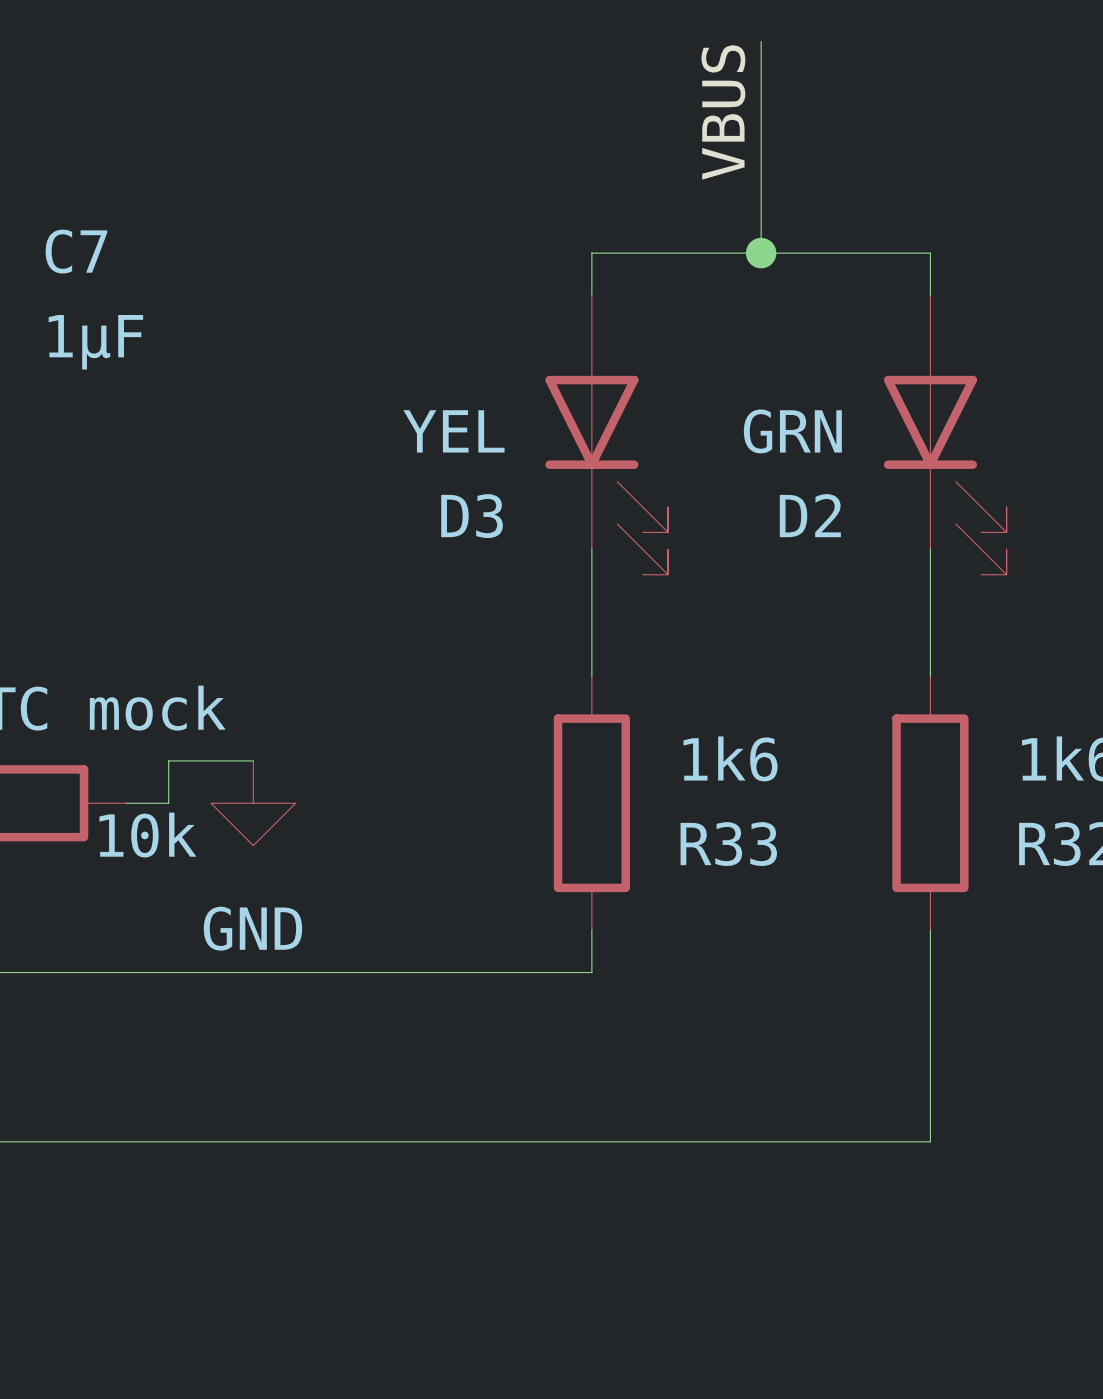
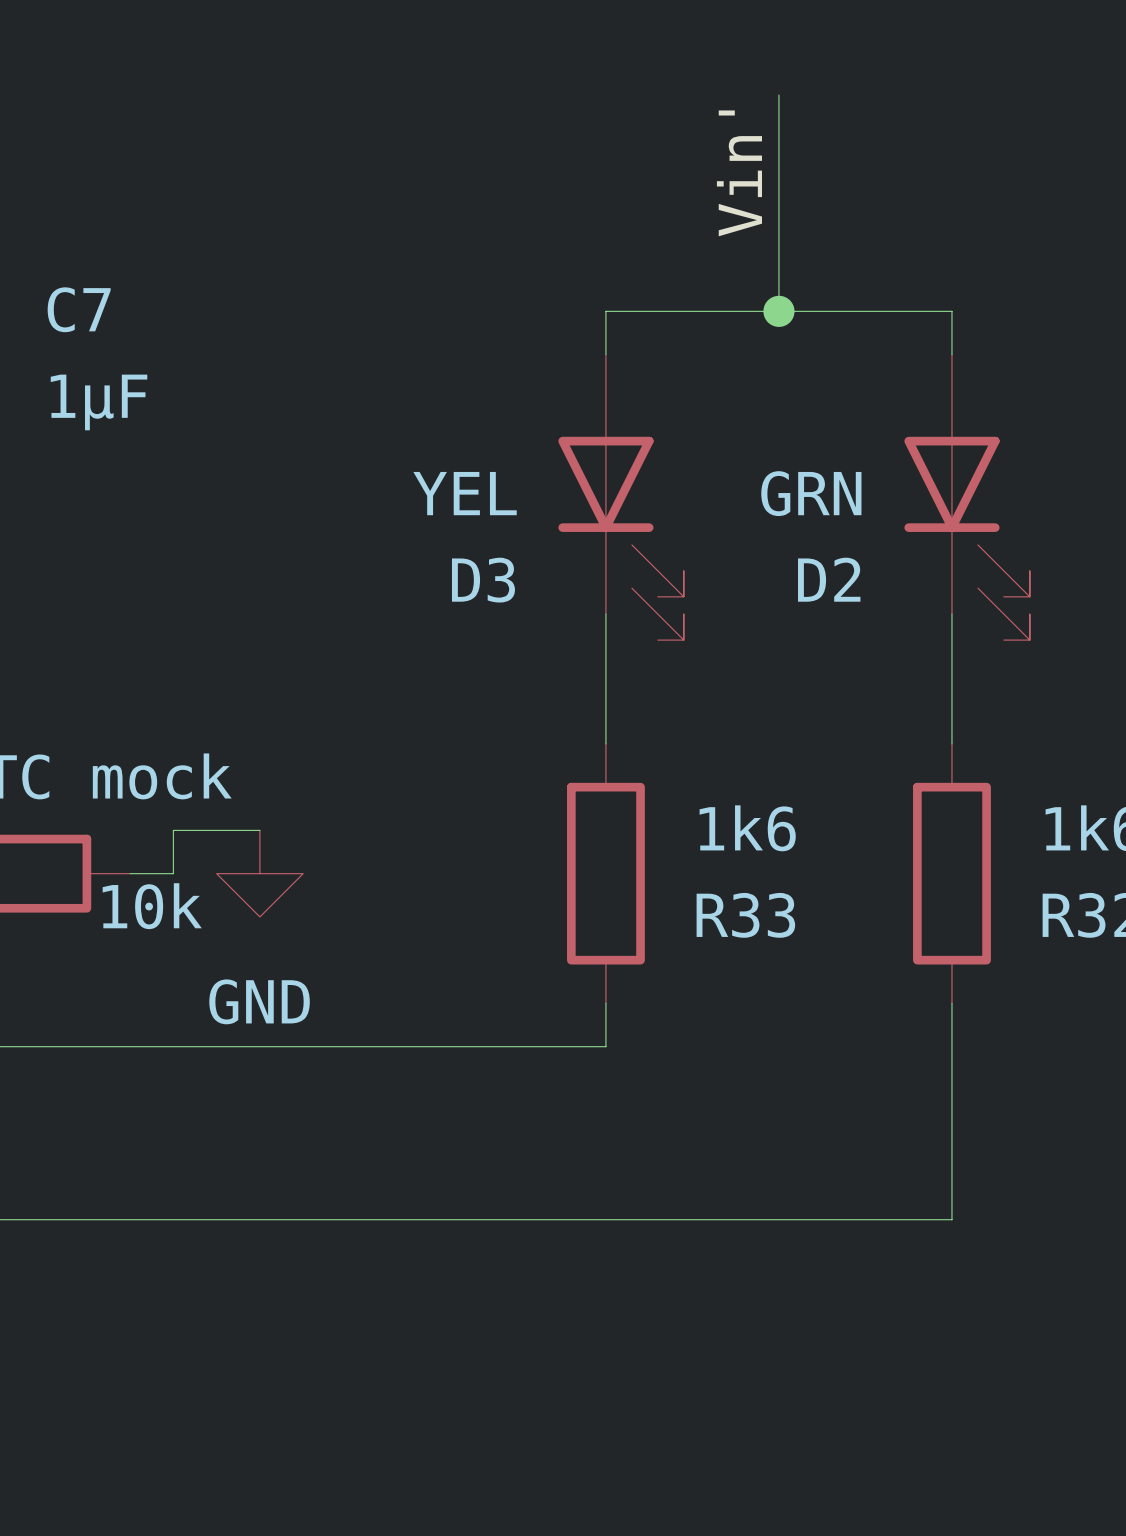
label: VBUS (723, 112) -> Vin' (739, 173)

